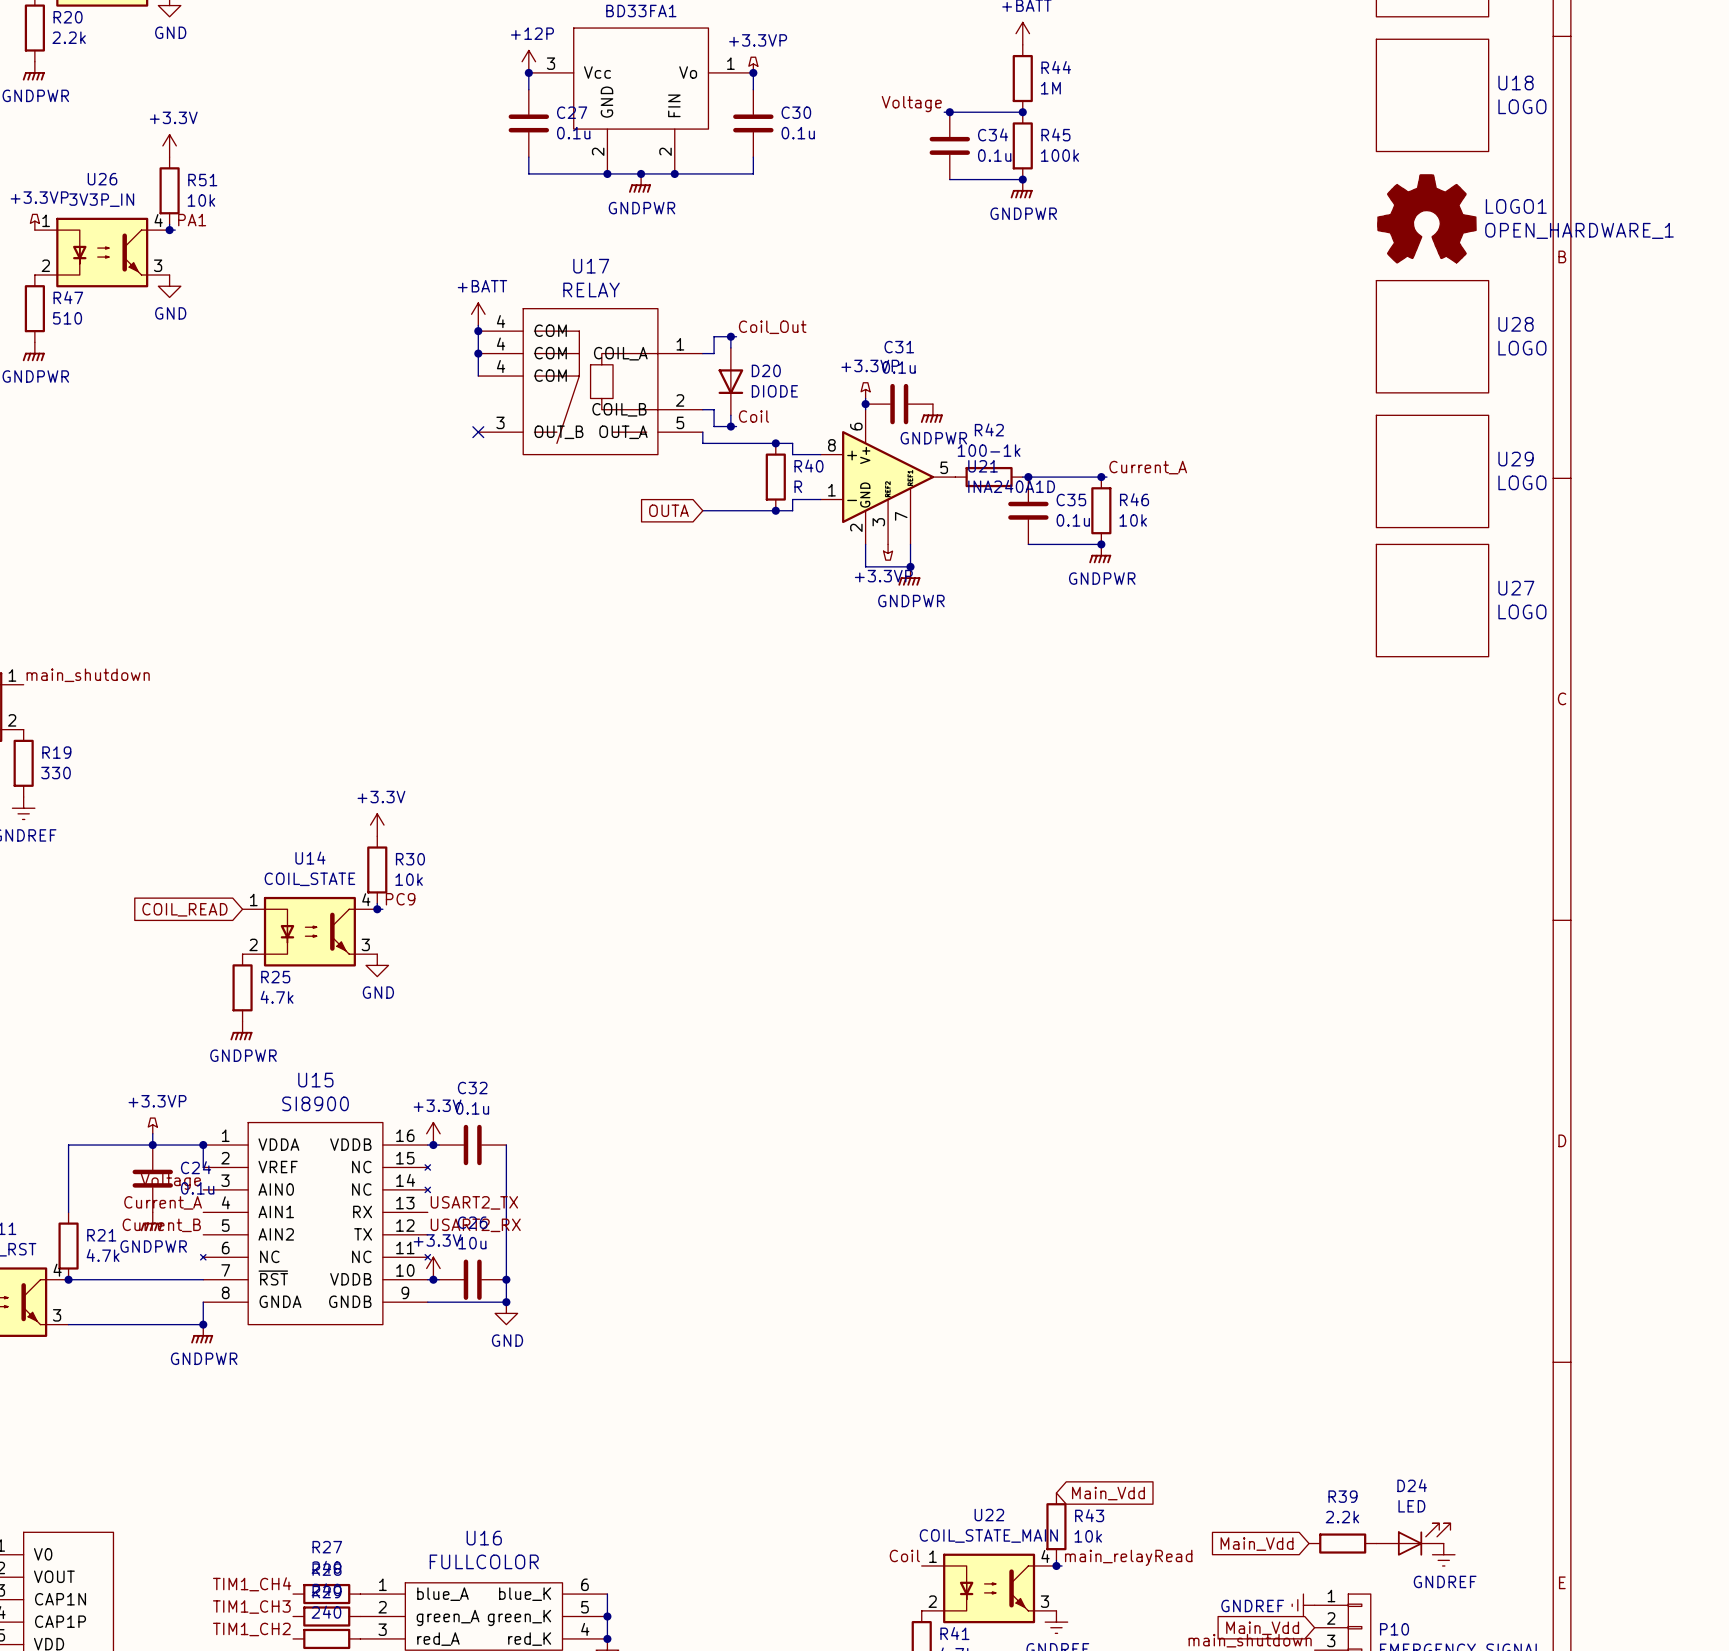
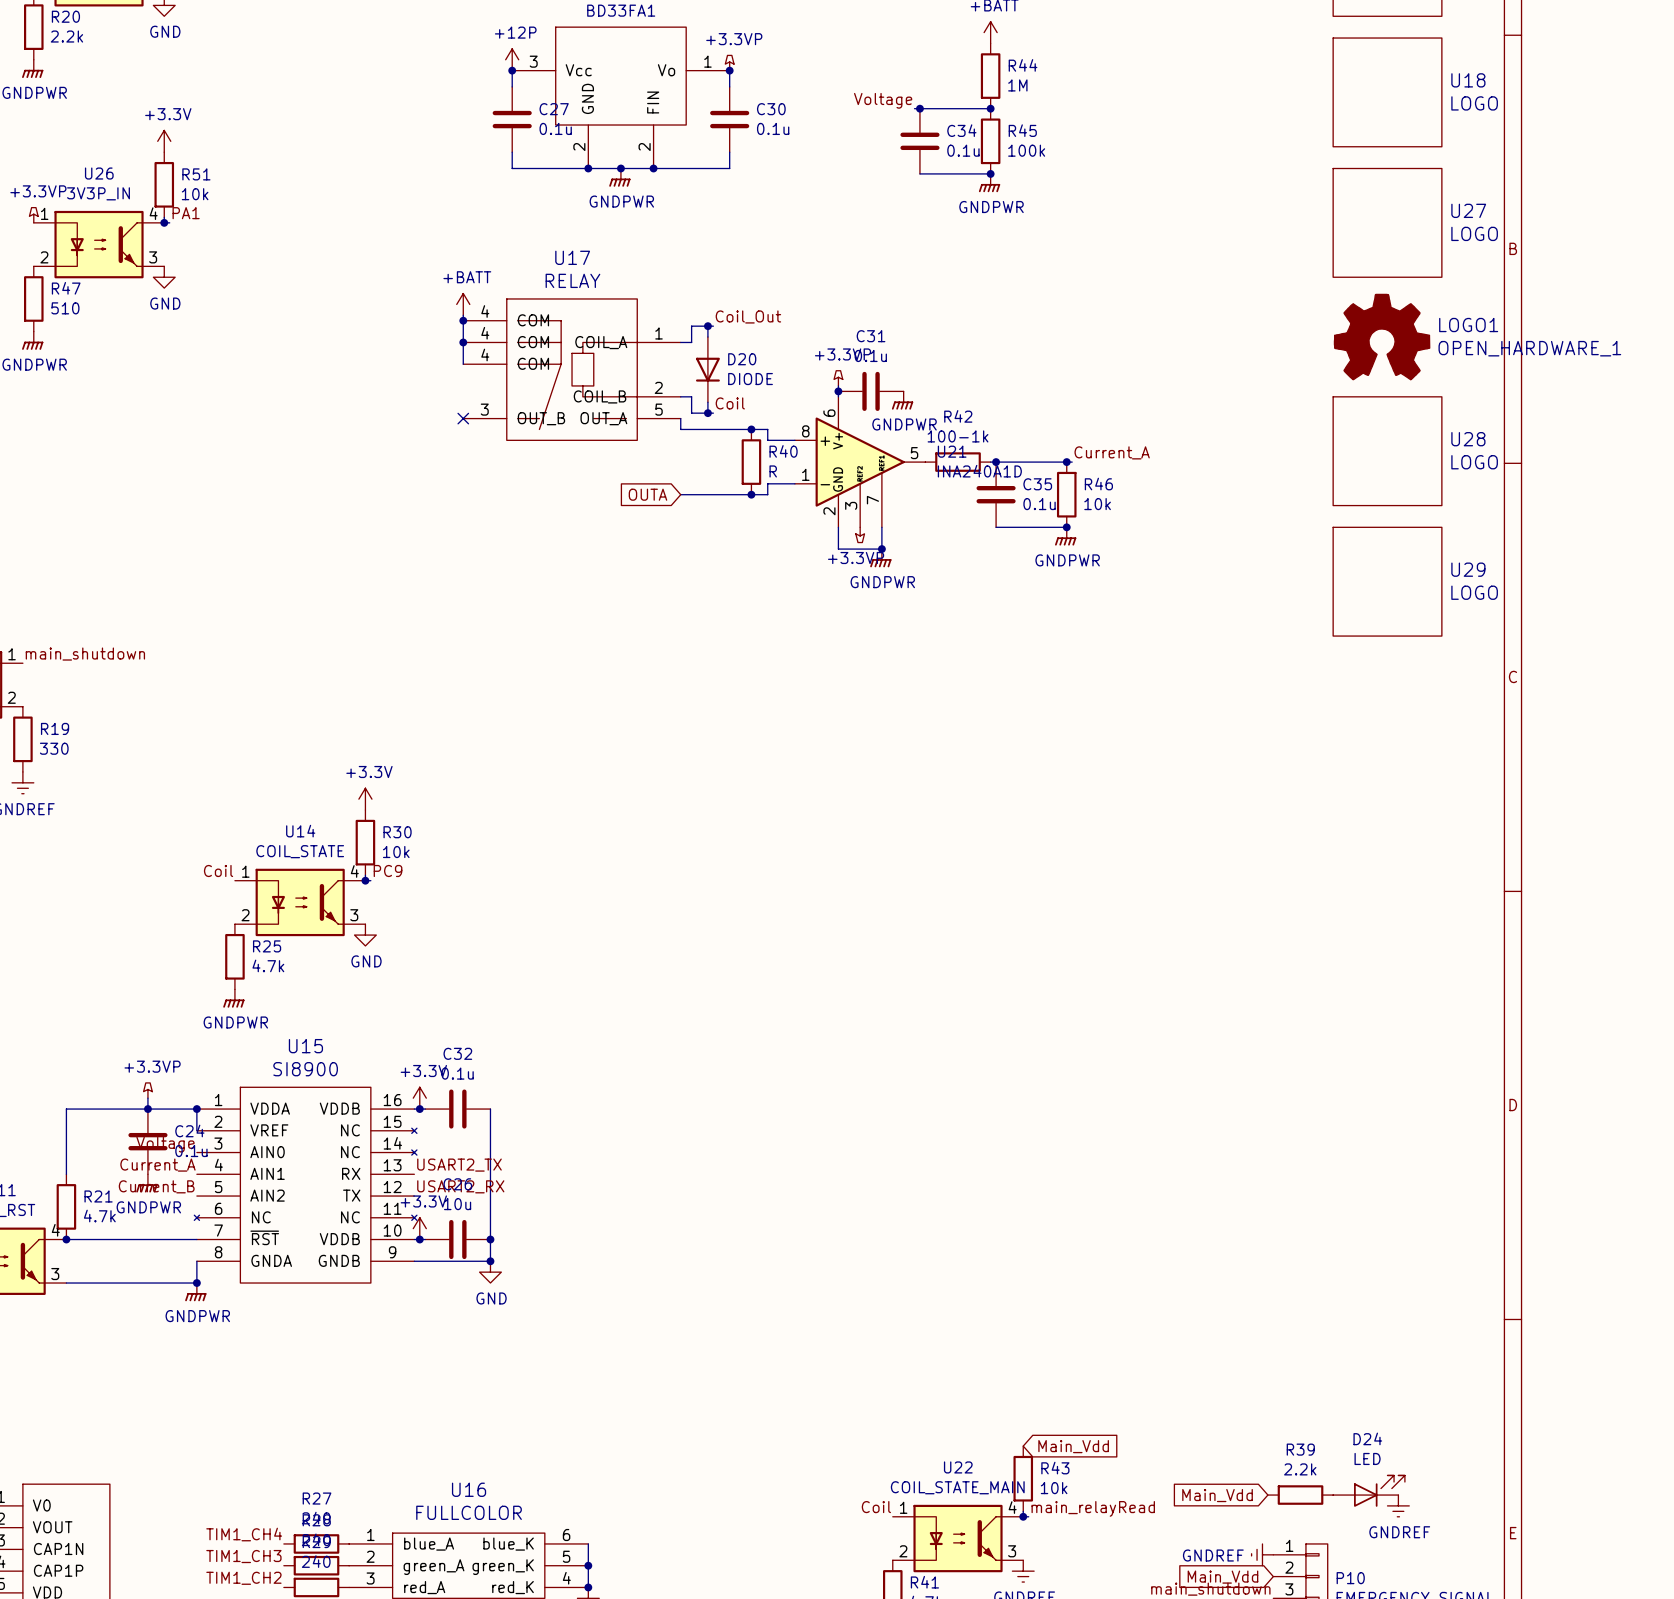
LOGO1 position: (1426, 218) -> (1382, 337)
U27: none -> LOGO (1387, 222)
U28 position: (1432, 336) -> (1387, 451)
U29: LOGO (1432, 471) -> none
U27 name: U27 (1516, 588) -> U29 (1468, 569)
label: none -> Coil (218, 870)
global label: COIL_READ (184, 909) -> none

